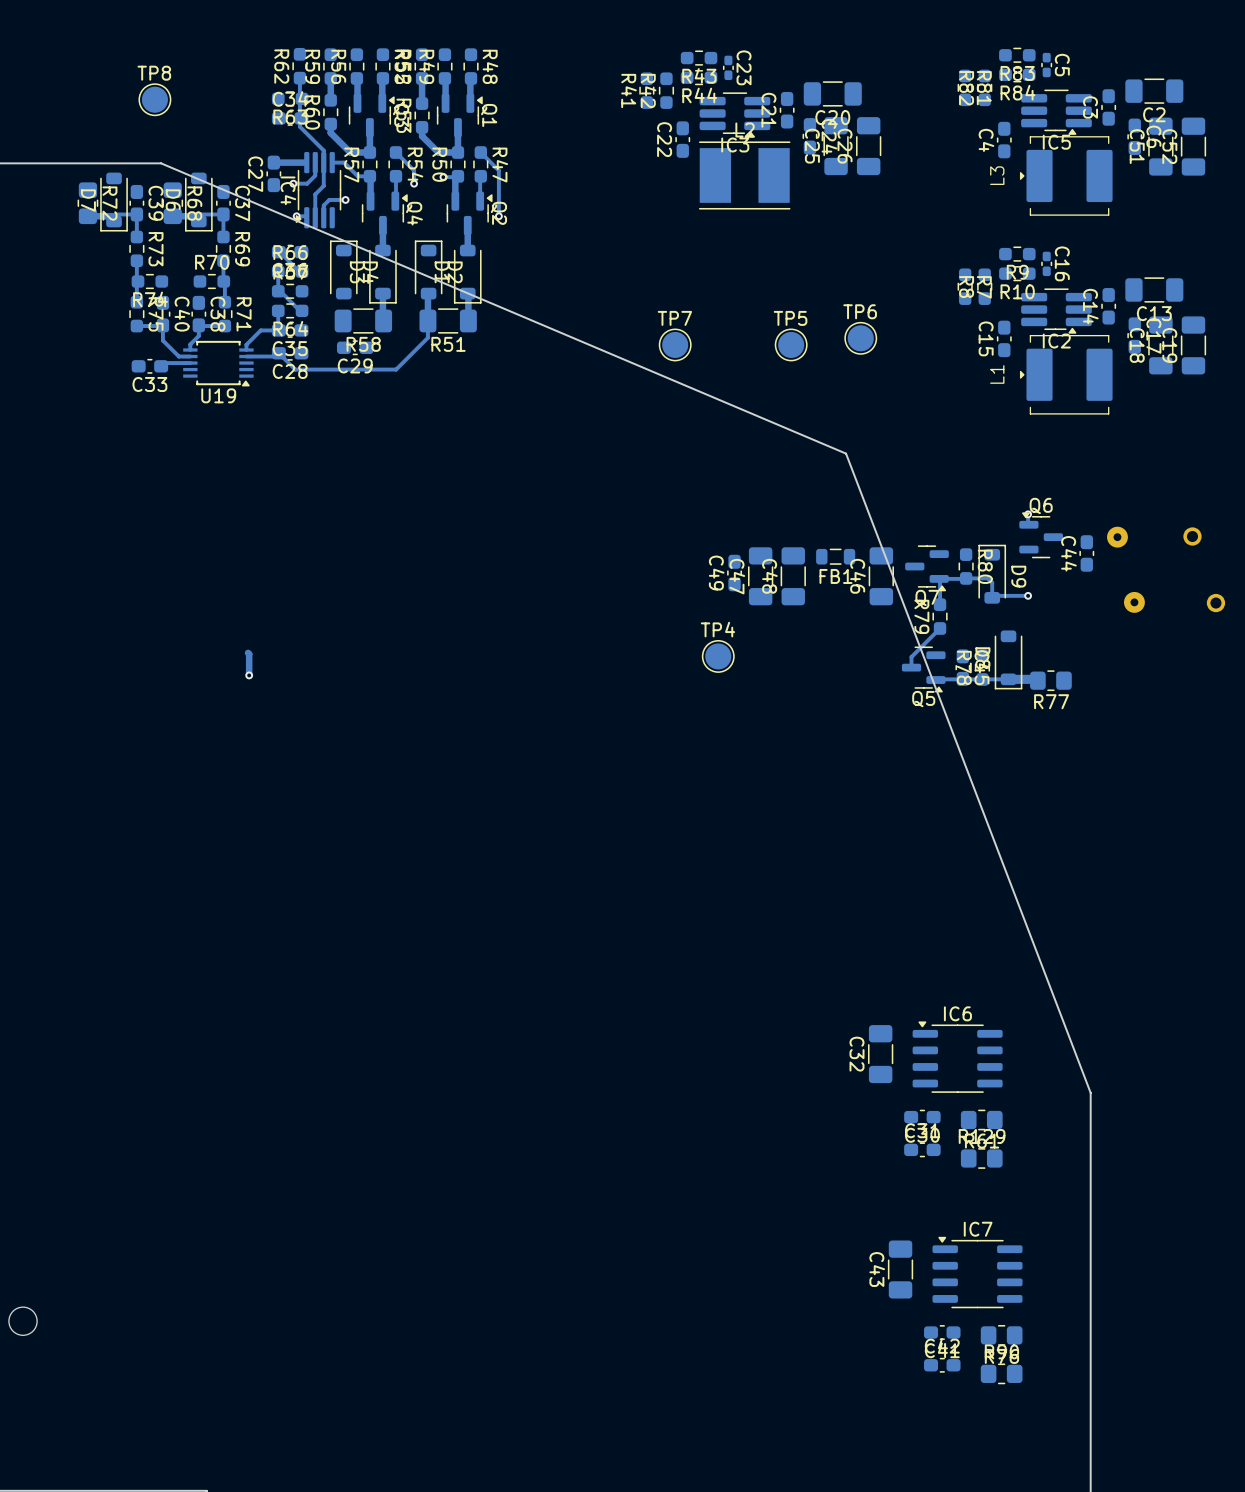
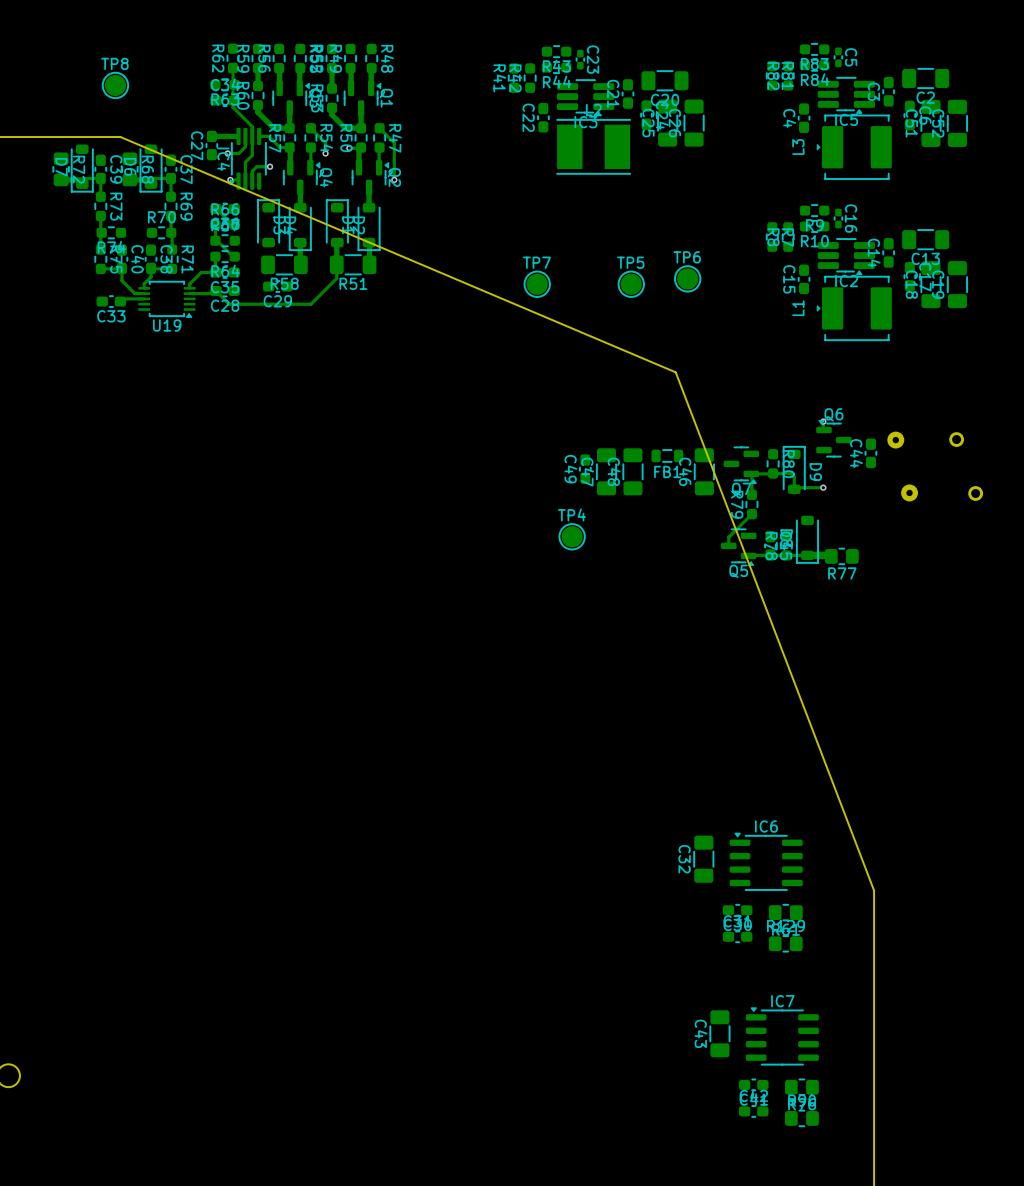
track: (248, 652) (249, 675) -> none
via: (249, 675) -> none

